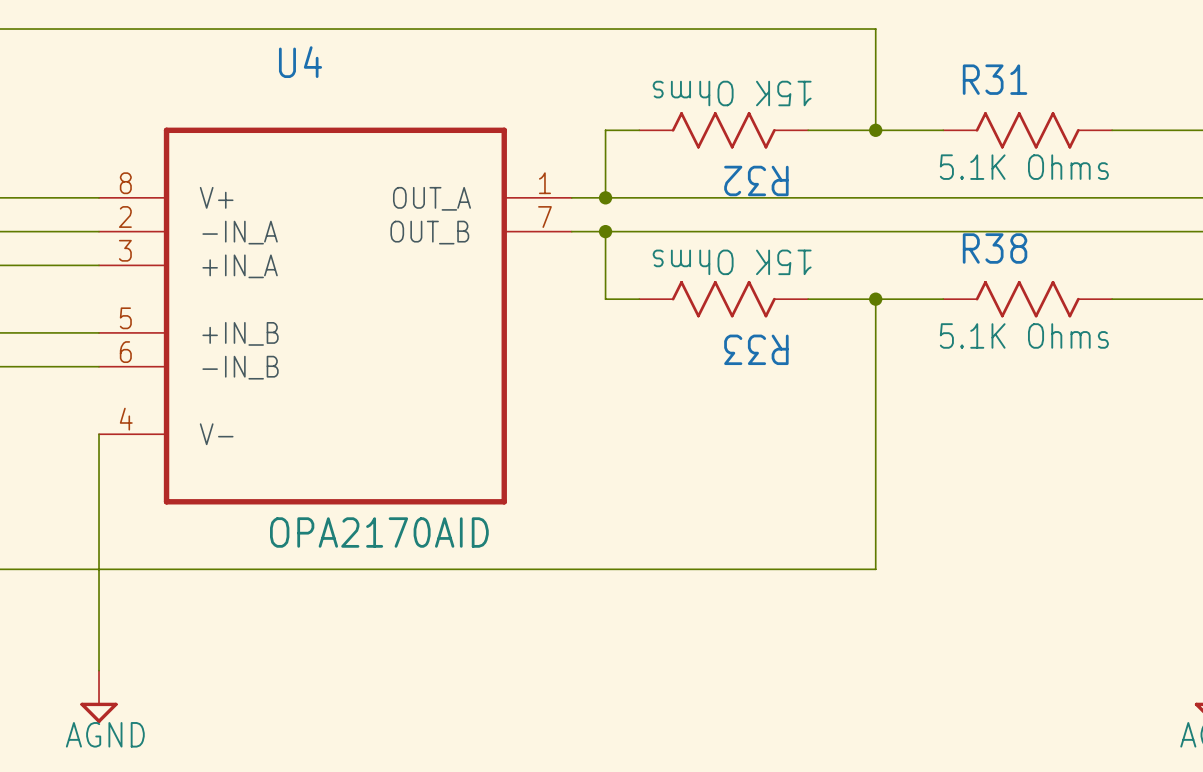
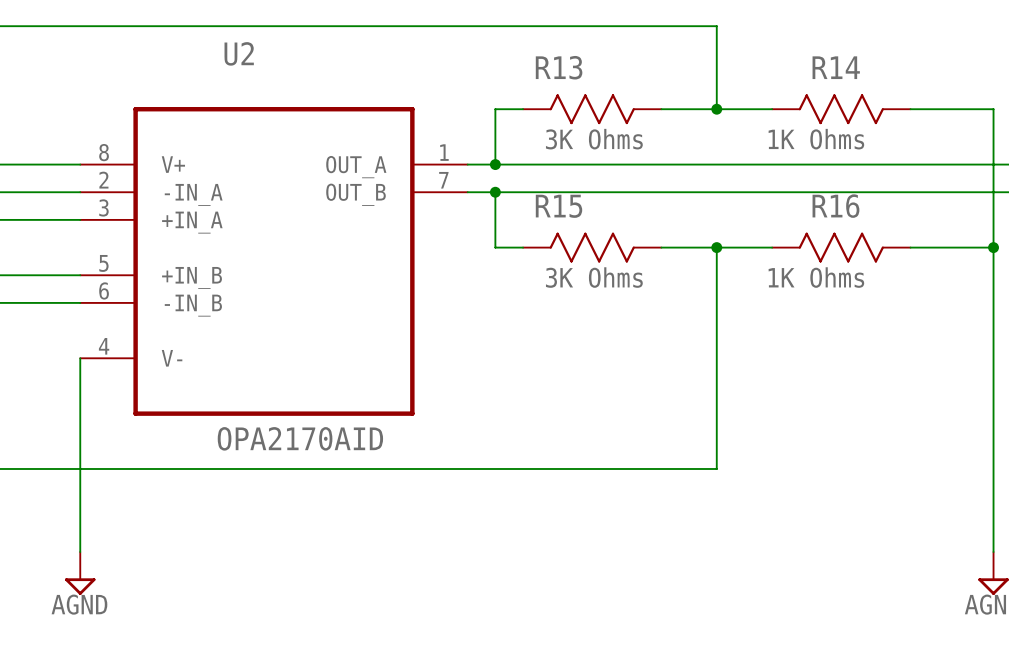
U4 name: U4 (300, 62) -> U2 (239, 53)
R31 name: R31 (995, 79) -> R14 (836, 67)
R32 value: 15K Ohms (732, 93) -> 3K Ohms (594, 139)
R31 value: 5.1K Ohms (1024, 167) -> 1K Ohms (816, 139)
R32 name: R32 (756, 180) -> R13 (559, 67)
R38 name: R38 (995, 248) -> R16 (835, 206)
R33 value: 15K Ohms (732, 262) -> 3K Ohms (594, 277)
R38 value: 5.1K Ohms (1024, 335) -> 1K Ohms (816, 277)
R33 name: R33 (756, 349) -> R15 (559, 206)

